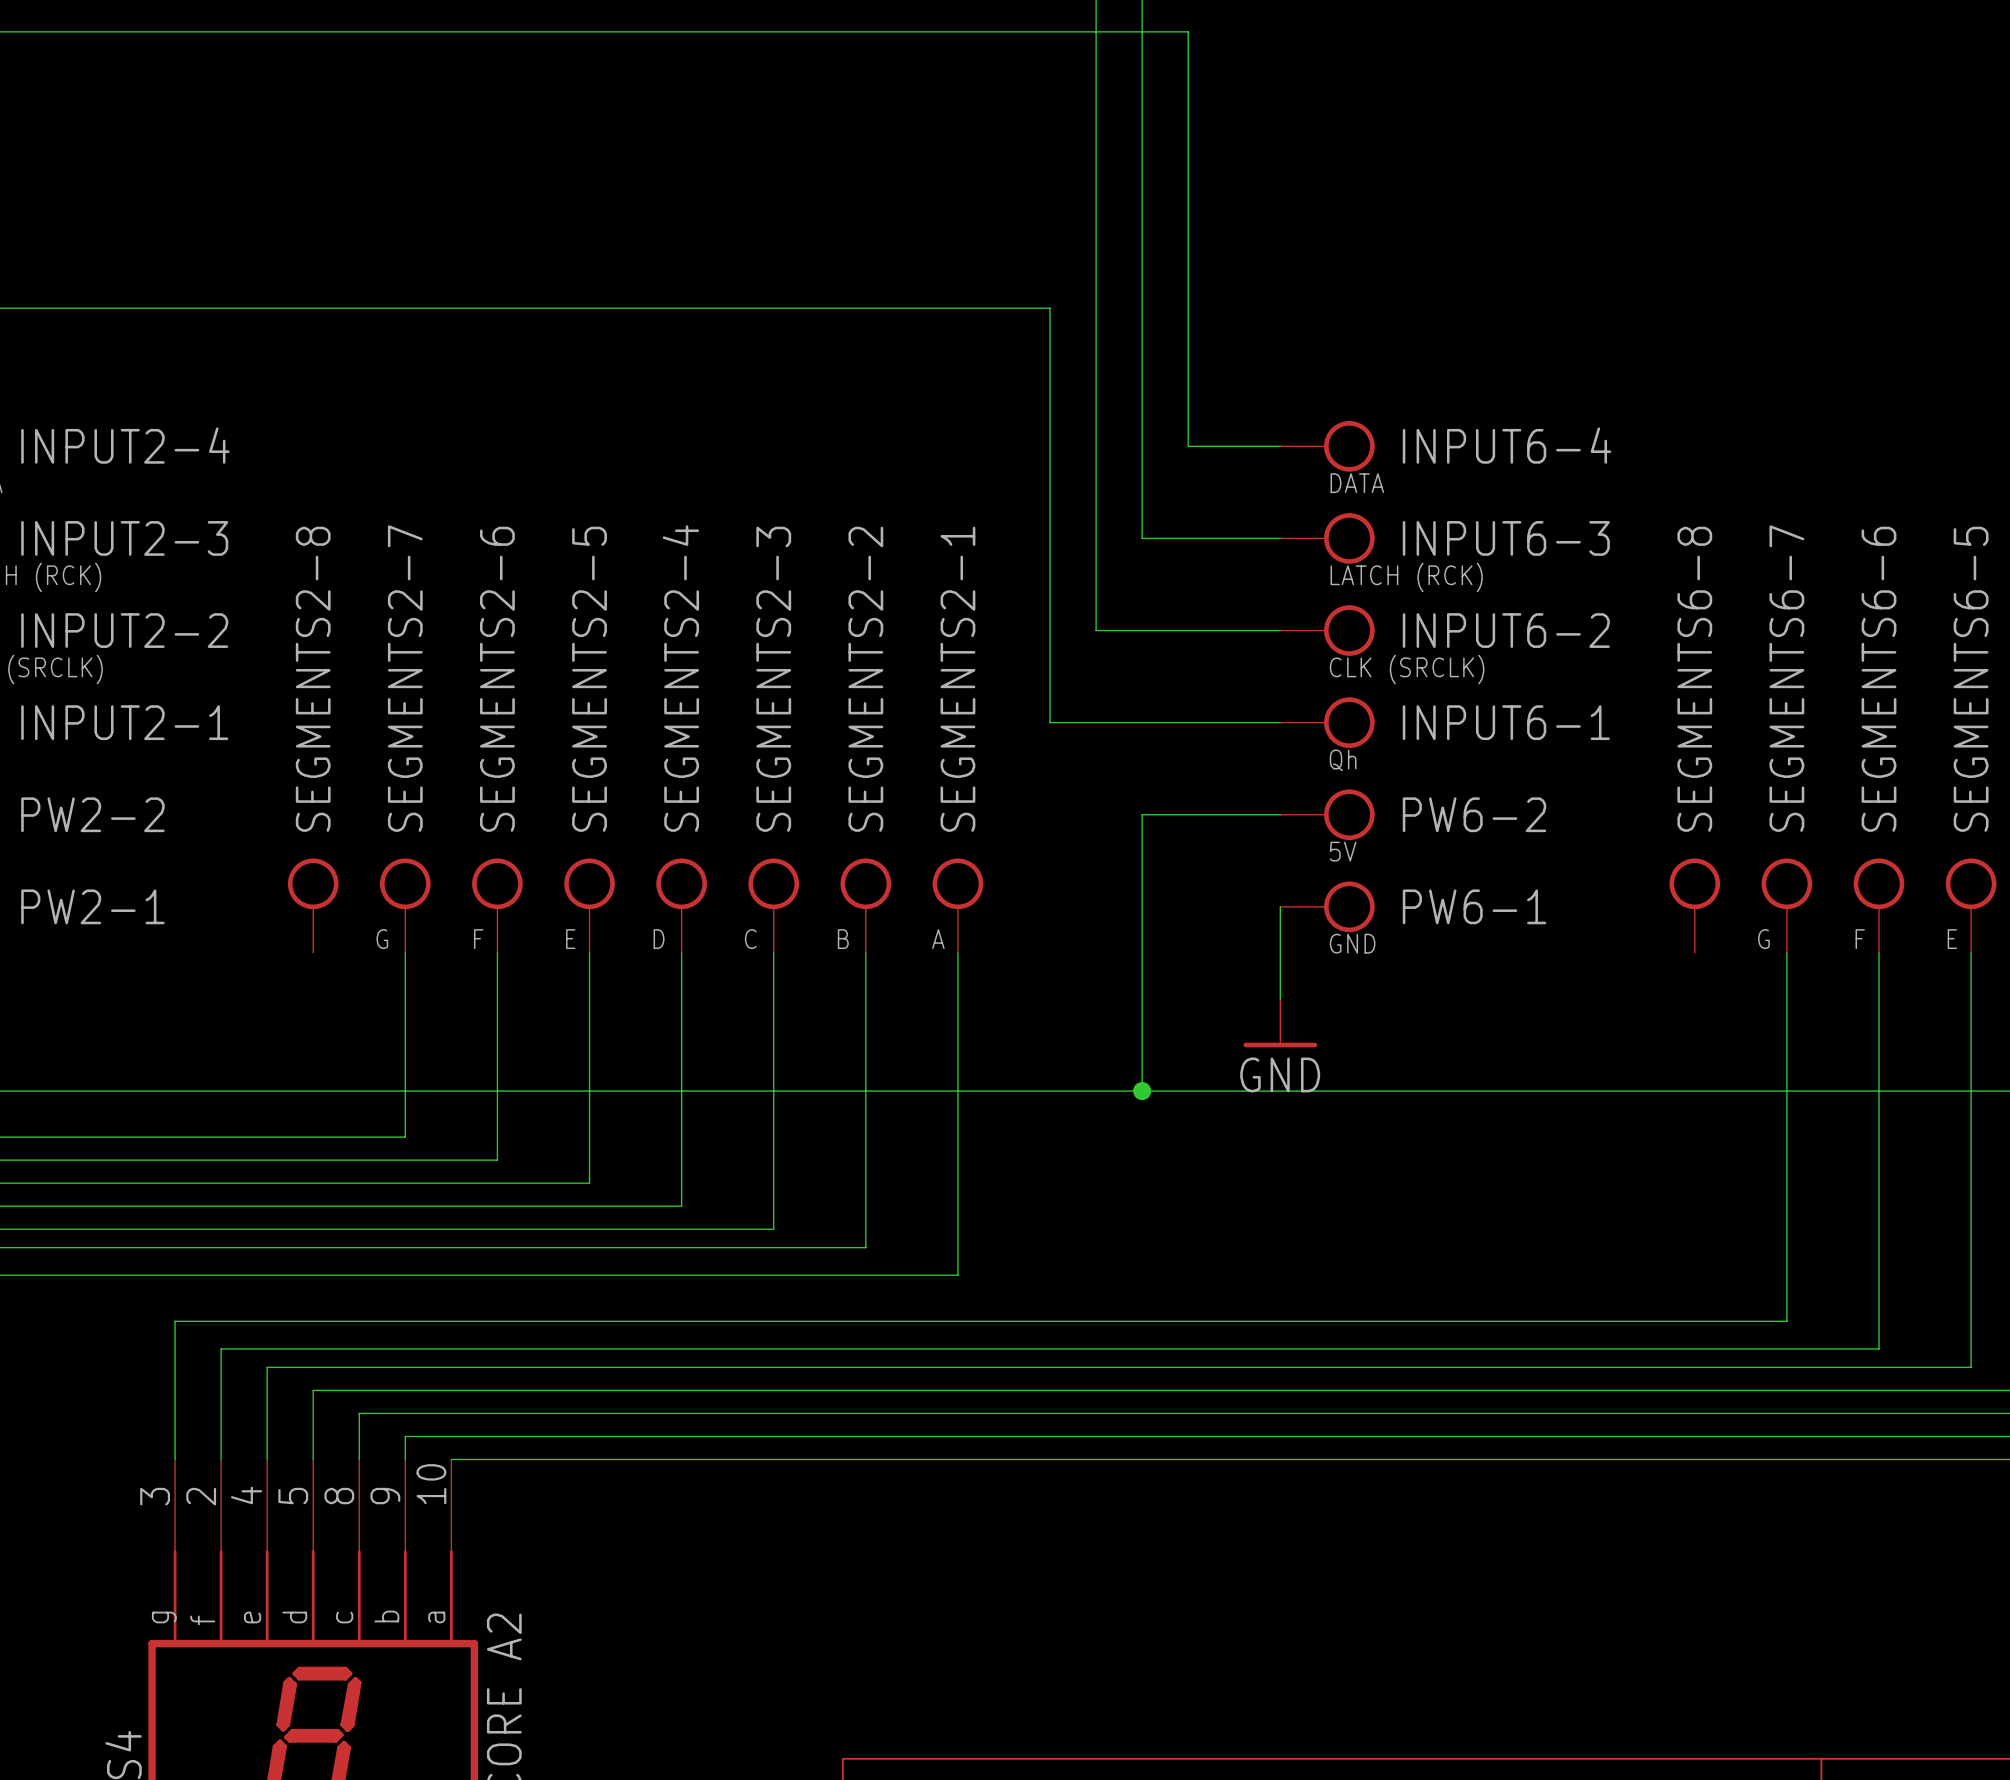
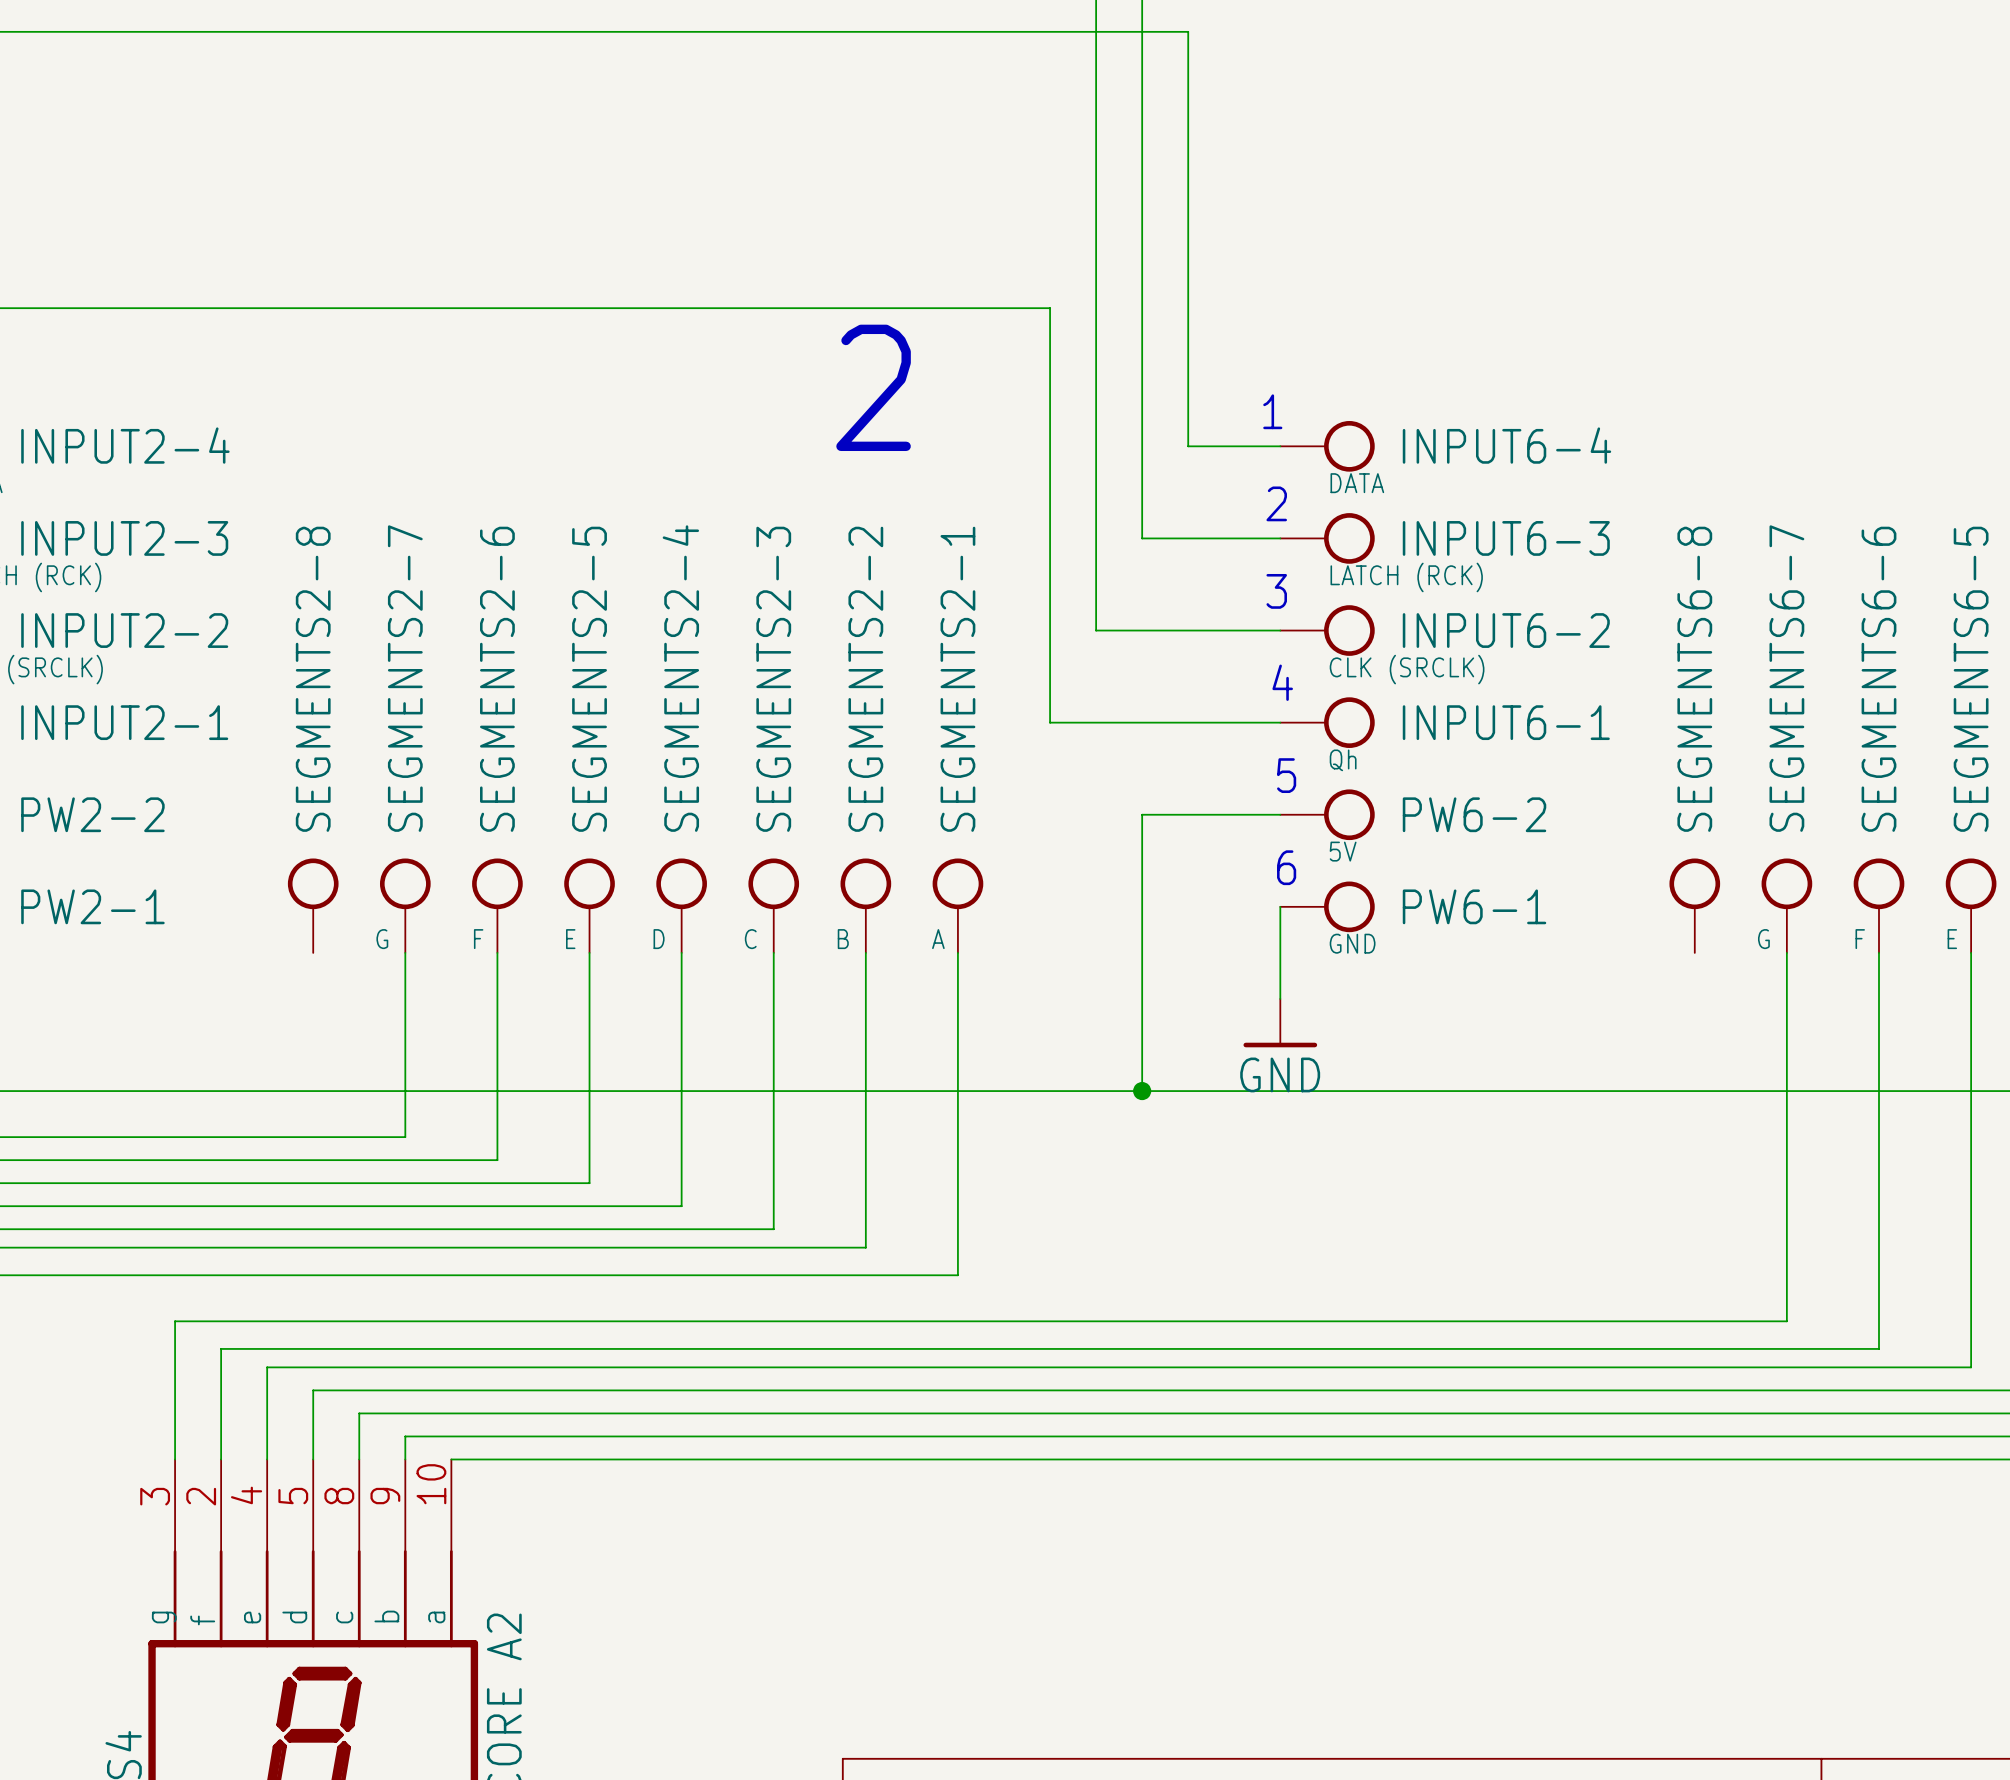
text: none -> 2 (873, 387)
text: none -> 1 (1272, 411)
text: none -> 2 (1276, 503)
text: none -> 3 (1276, 591)
text: none -> 4 (1282, 682)
text: none -> 5 (1286, 775)
text: none -> 6 (1286, 867)

